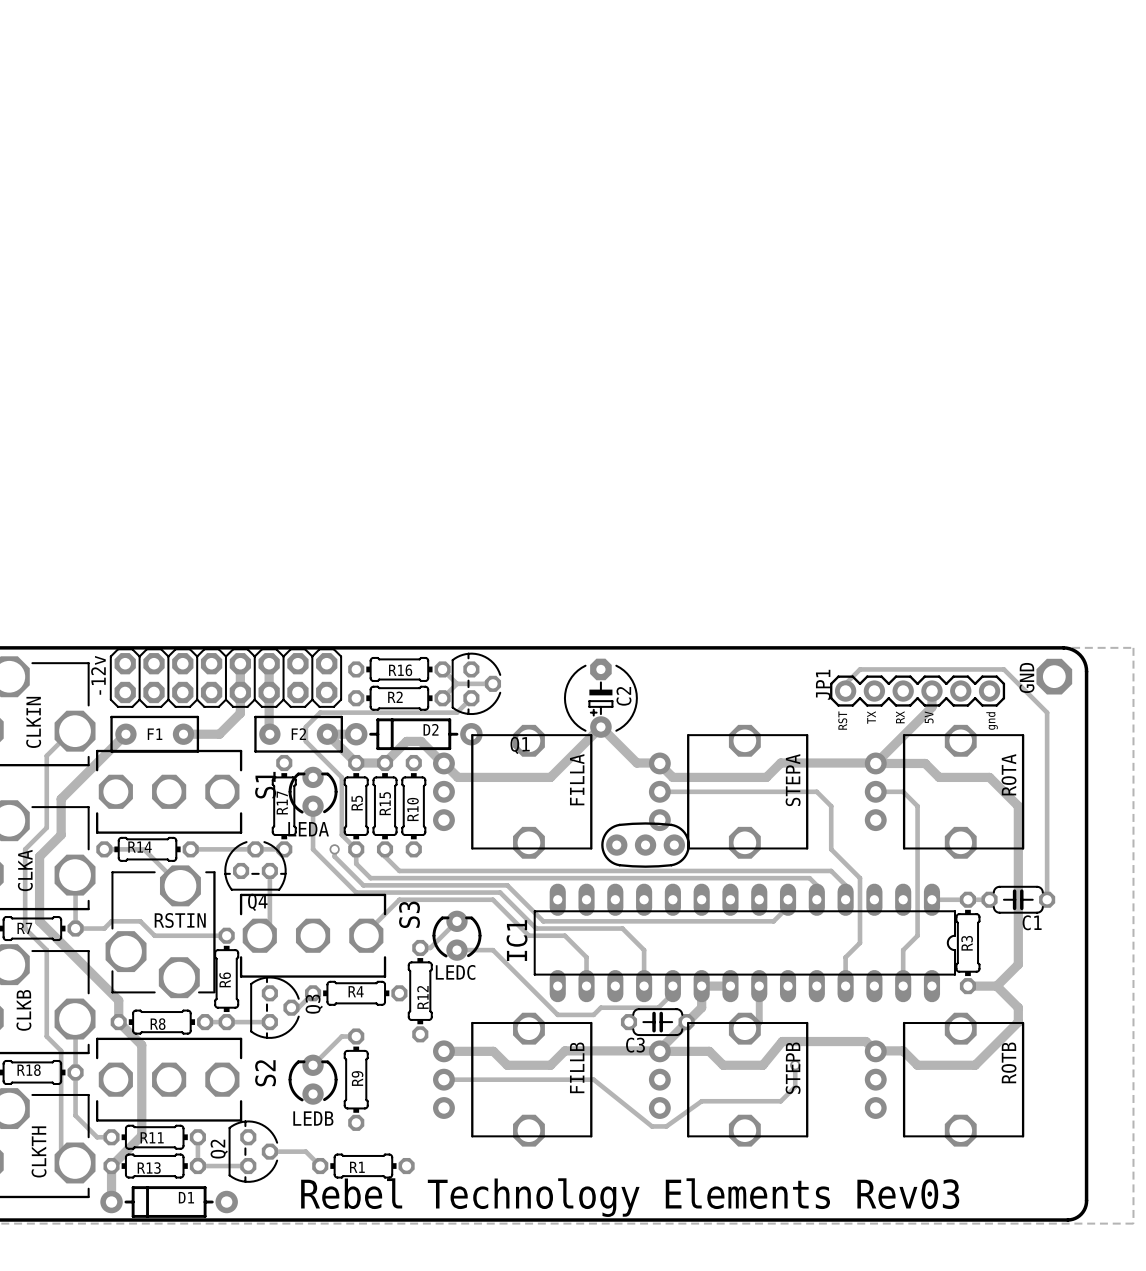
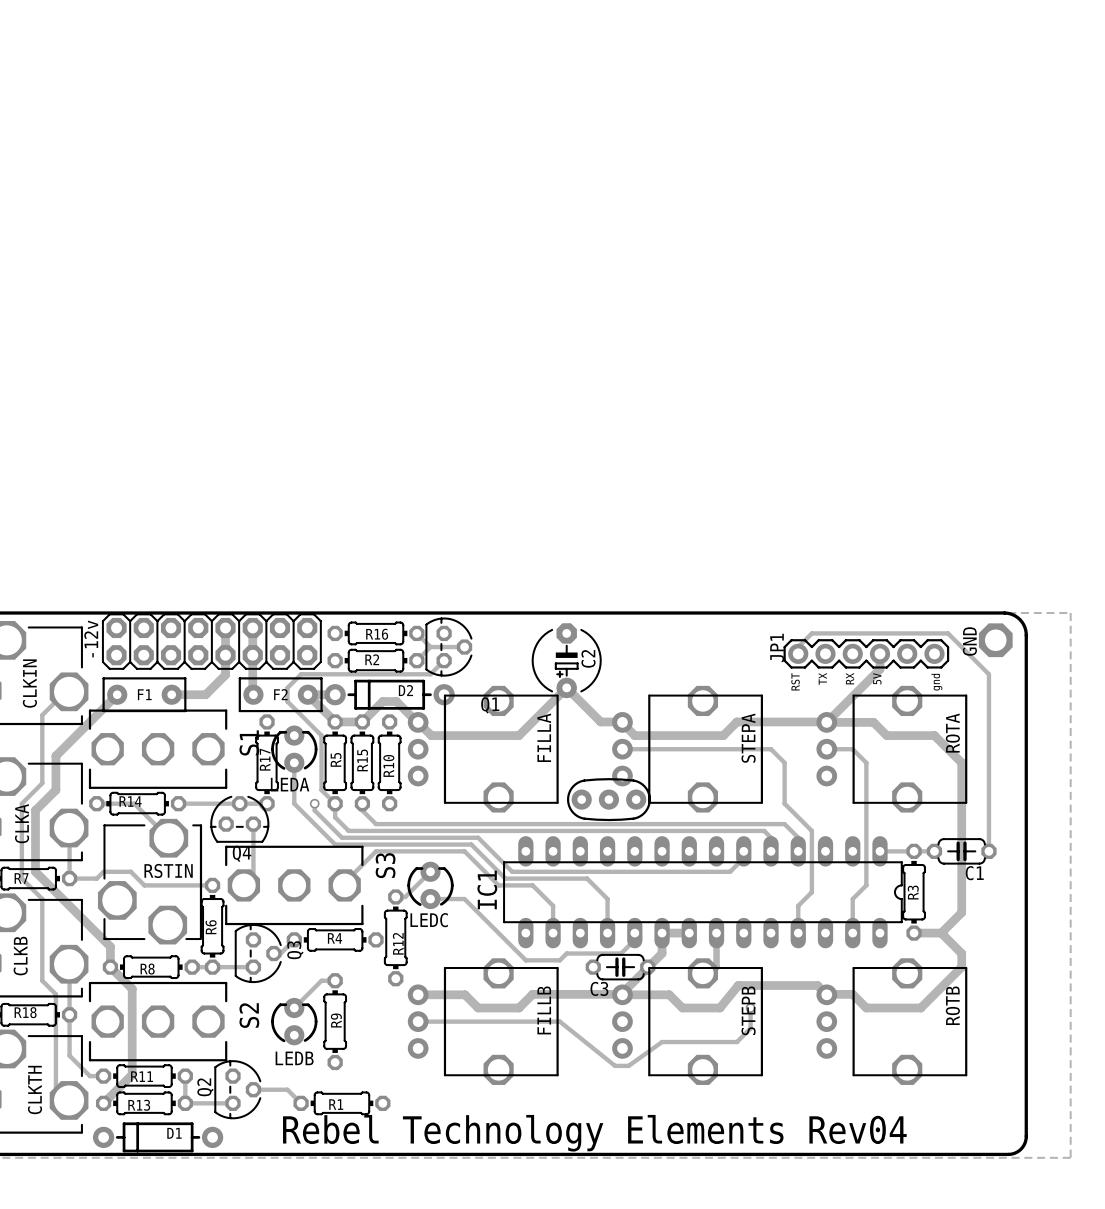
track: (111, 1166) (111, 1202) -> none
text: Rebel Technology Elements Rev03 (630, 1197) -> Rebel Technology Elements Rev04 (594, 1133)

